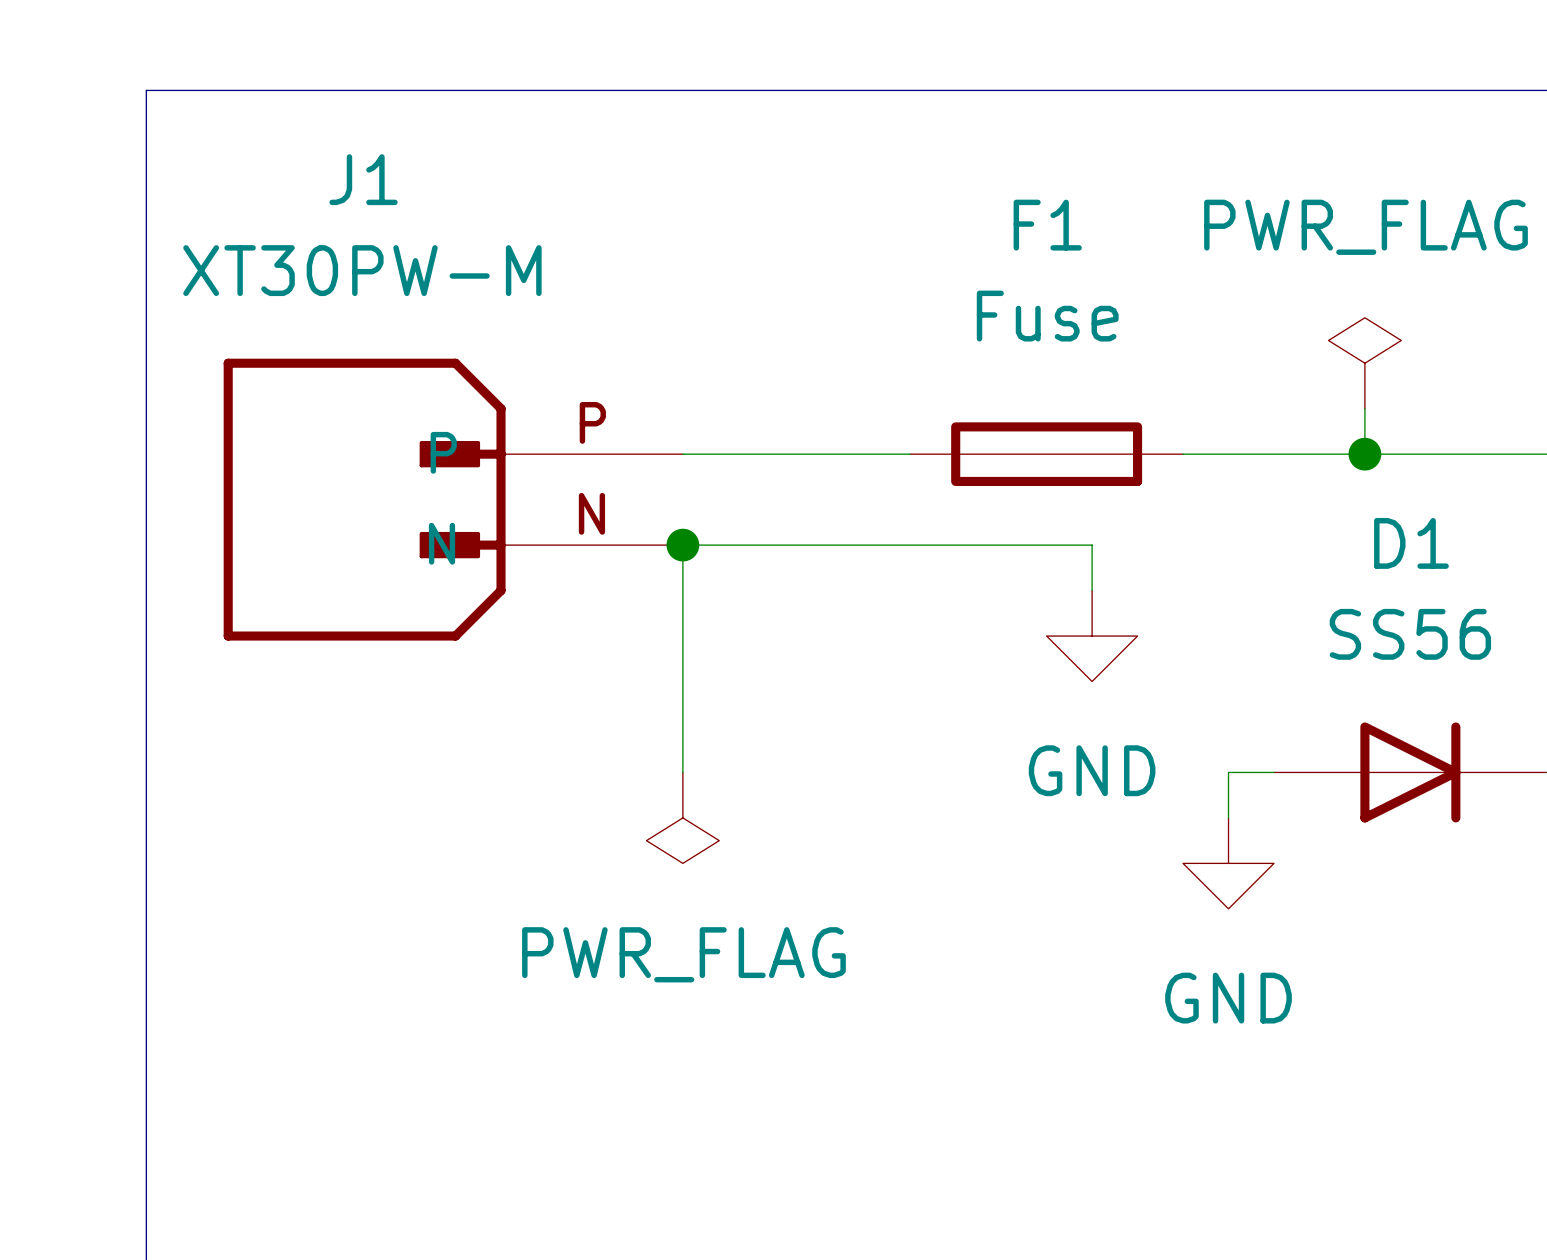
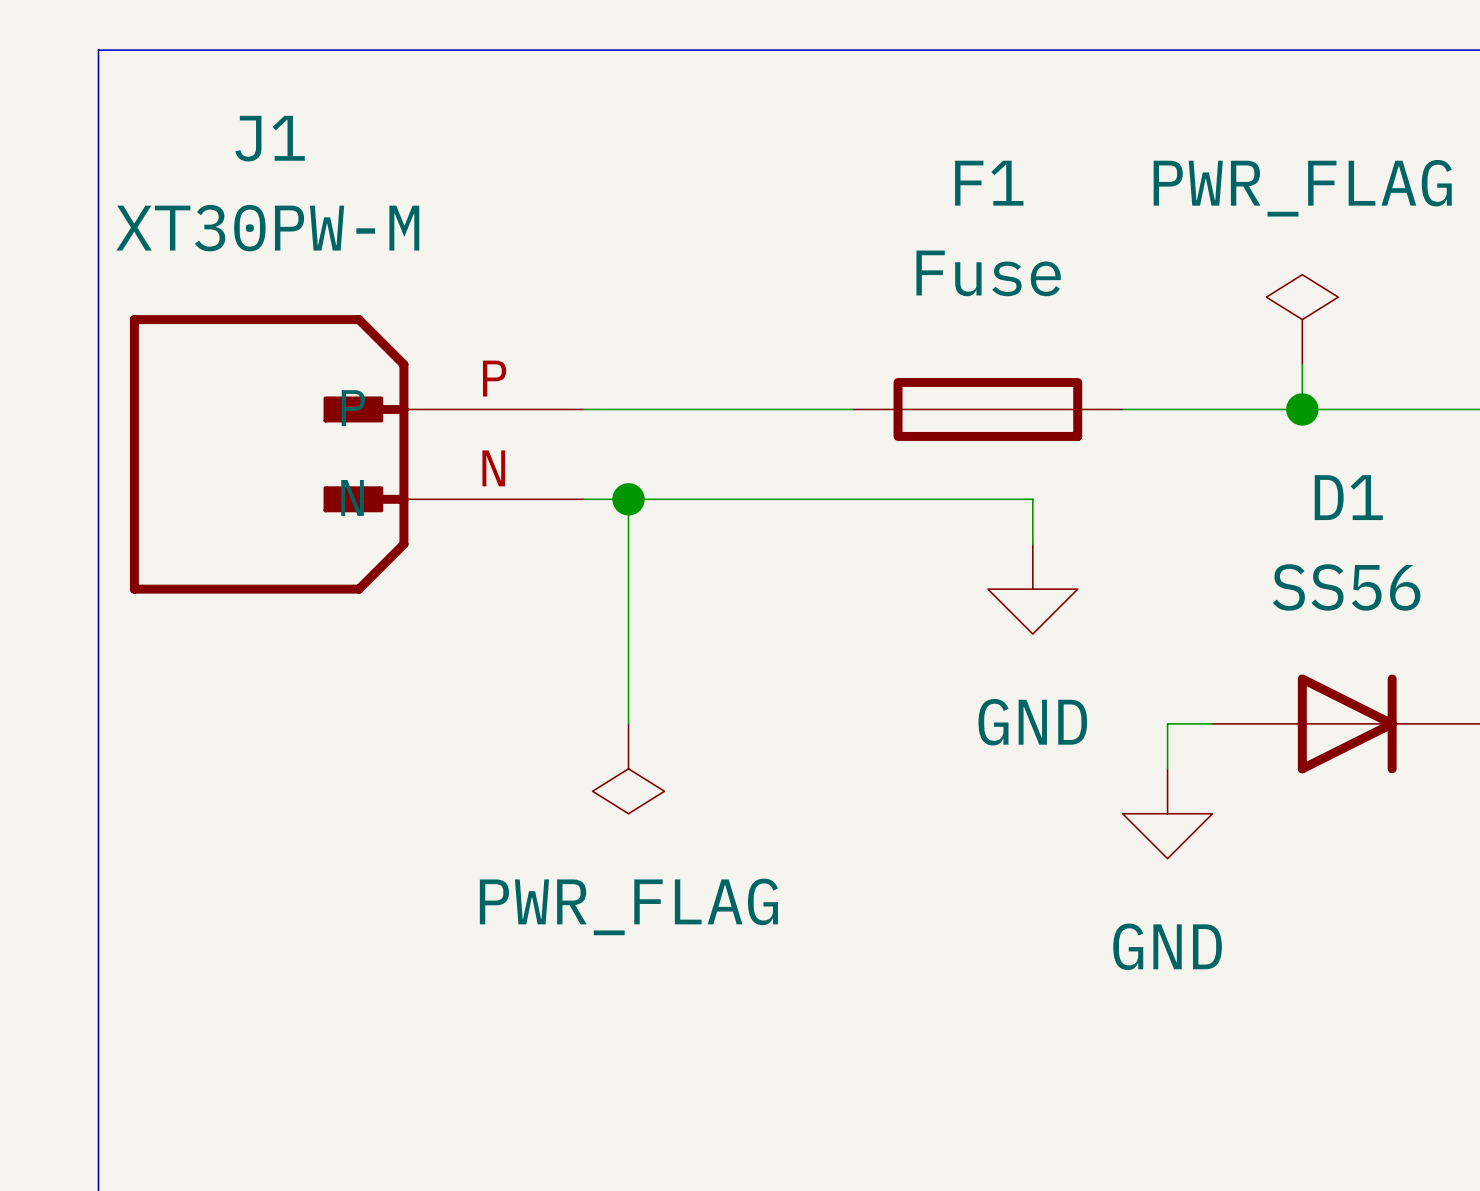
J1 position: (453, 499) -> (356, 454)

